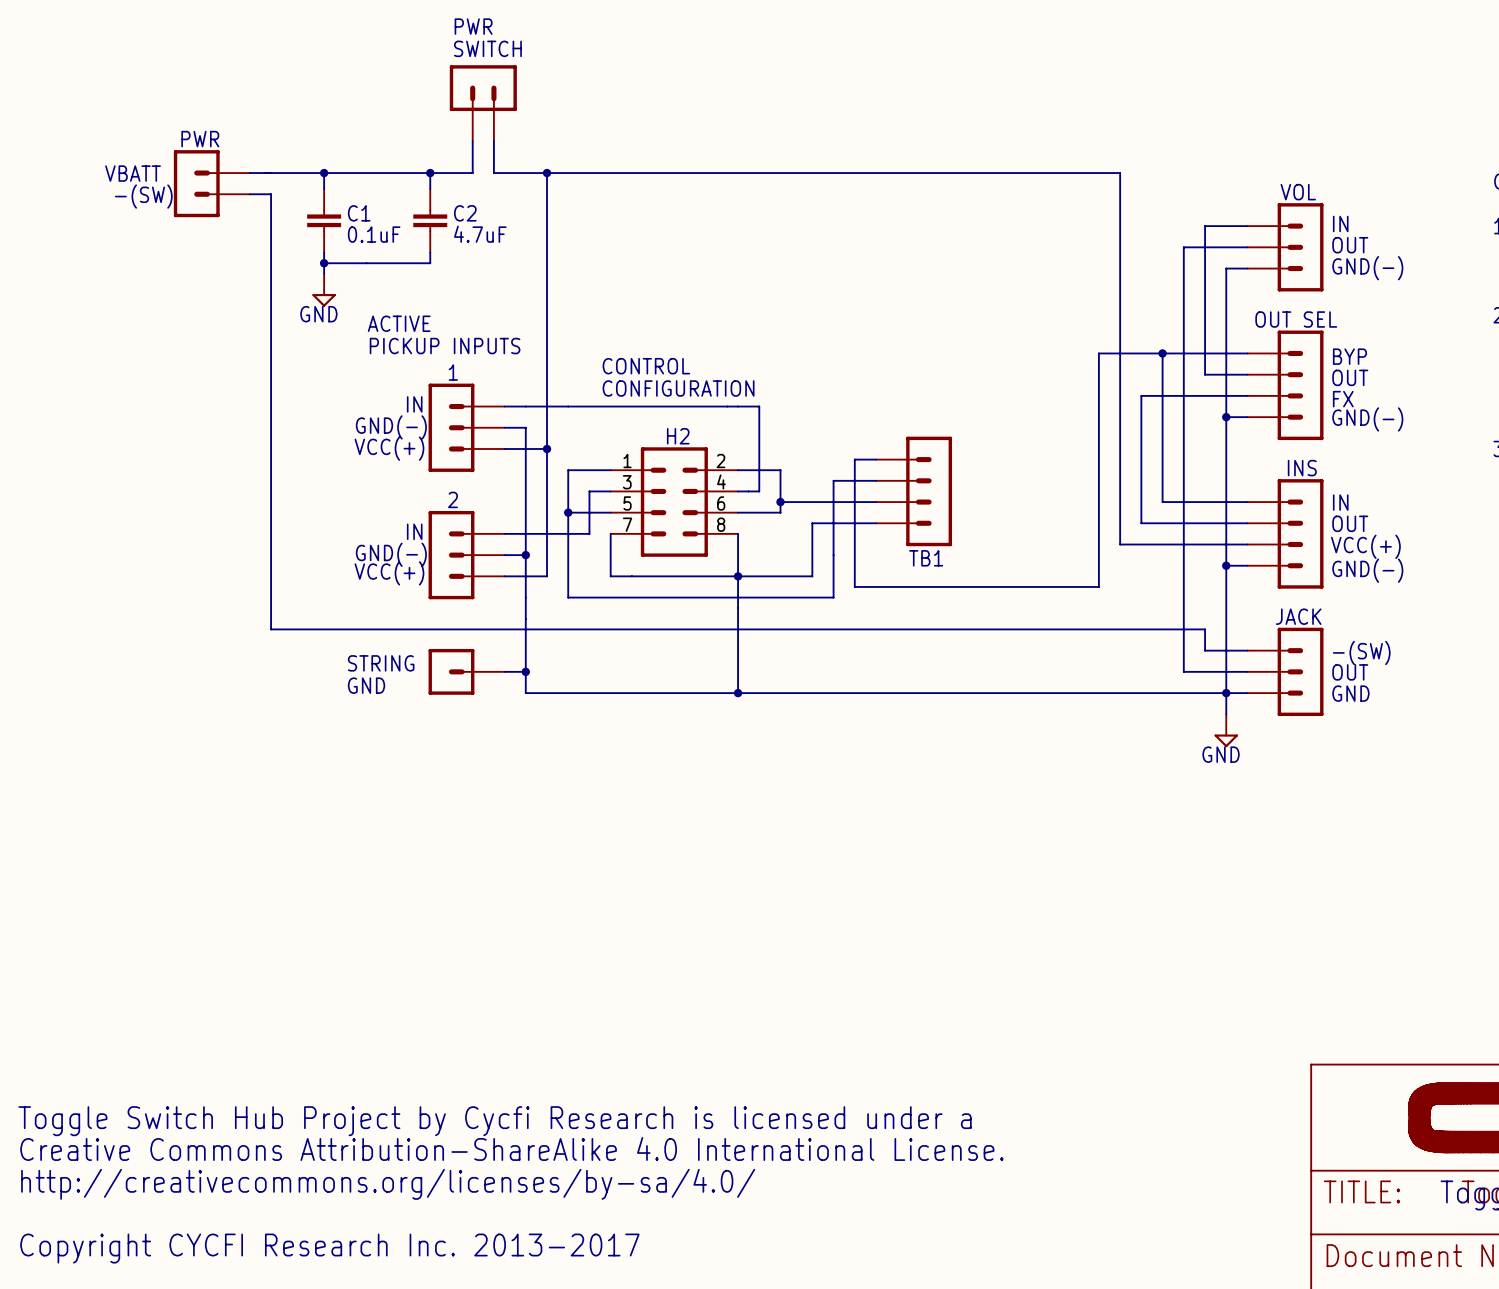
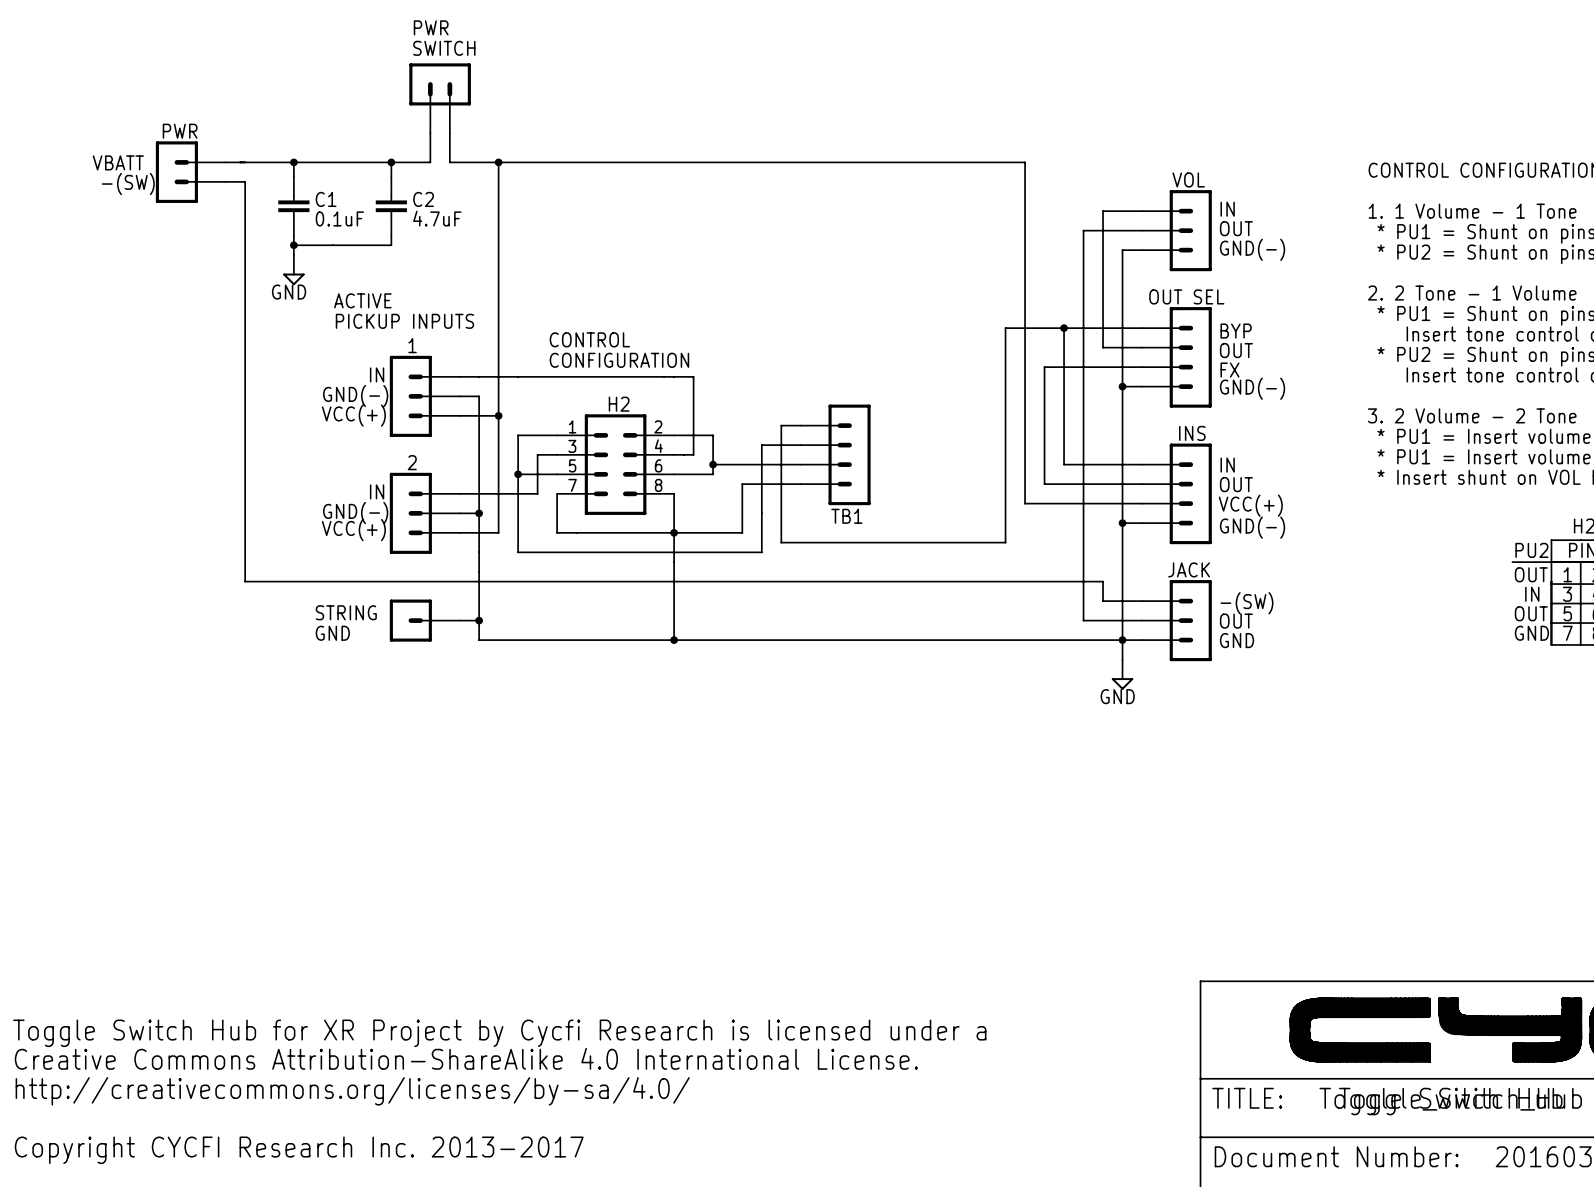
text: Toggle Switch Hub Project by Cycfi Research is licensed under a (495, 1121) -> Toggle Switch Hub for XR Project by Cycfi Research is licensed under a (499, 1033)

